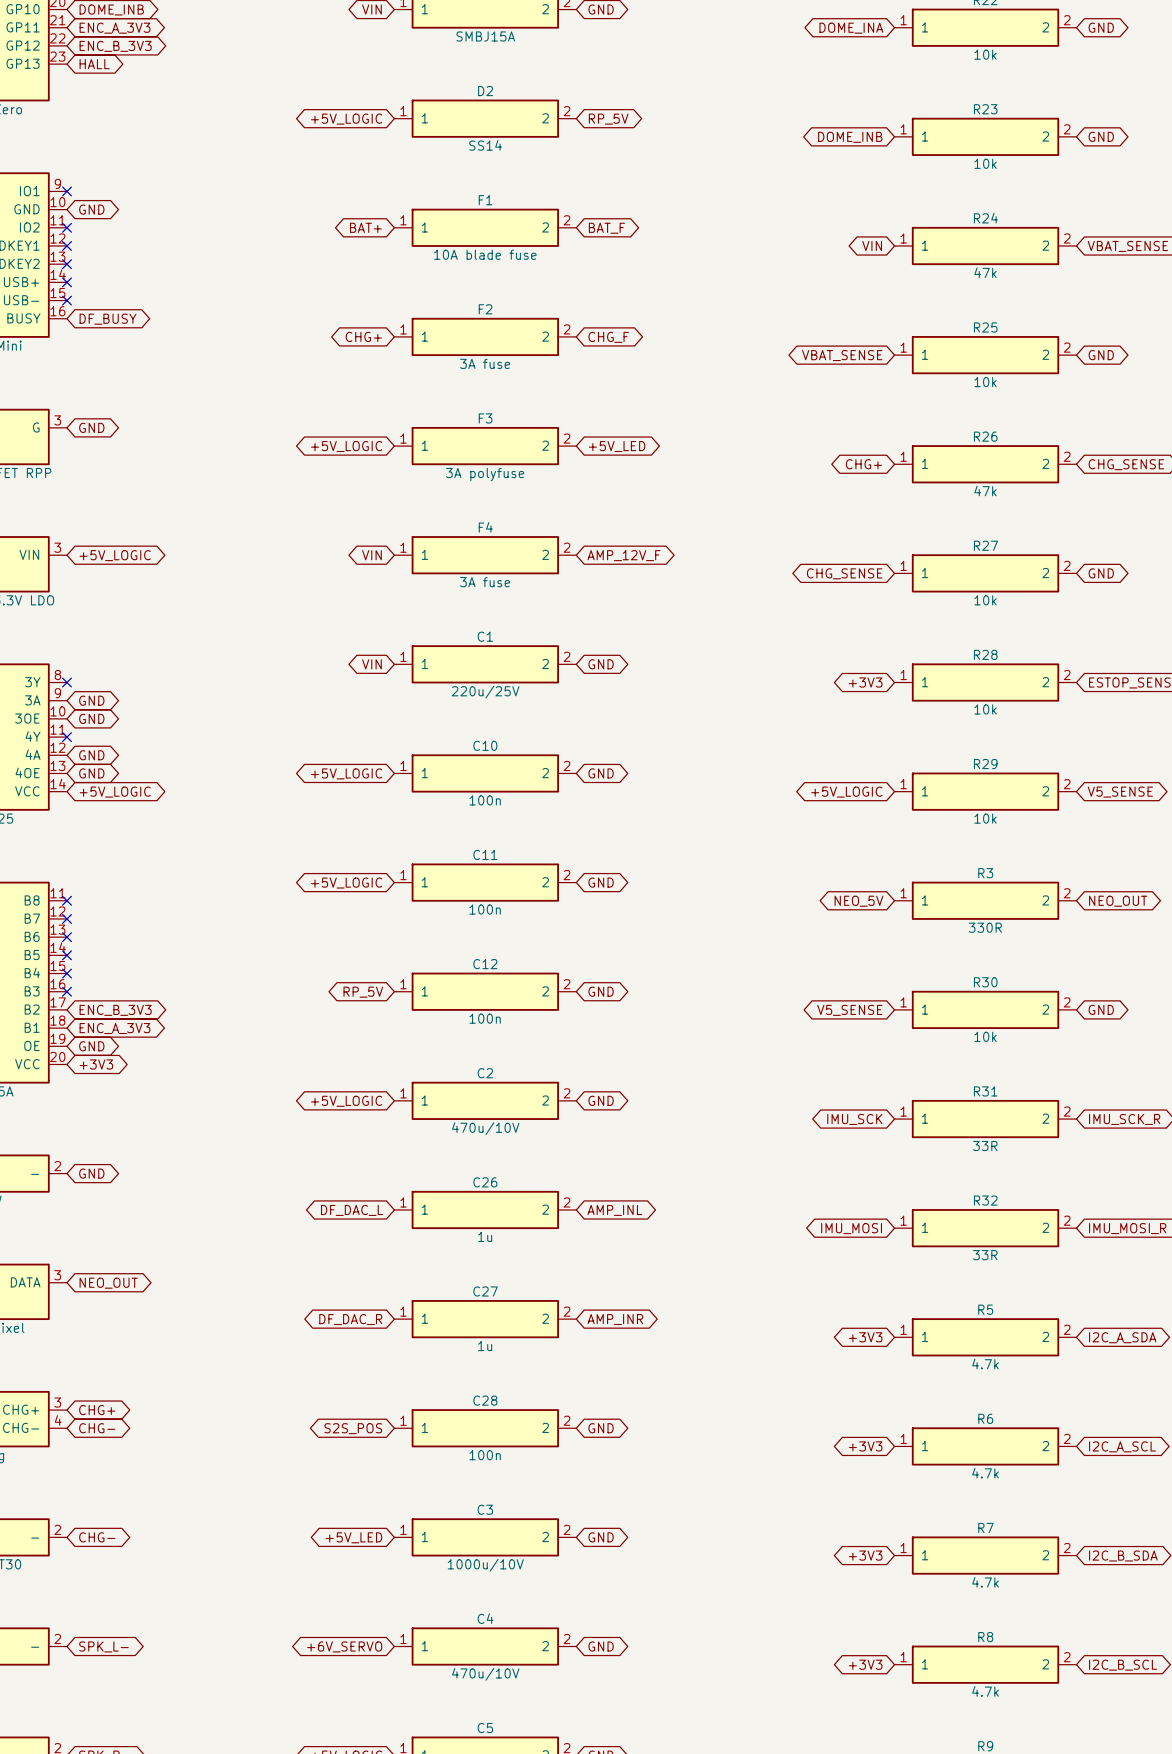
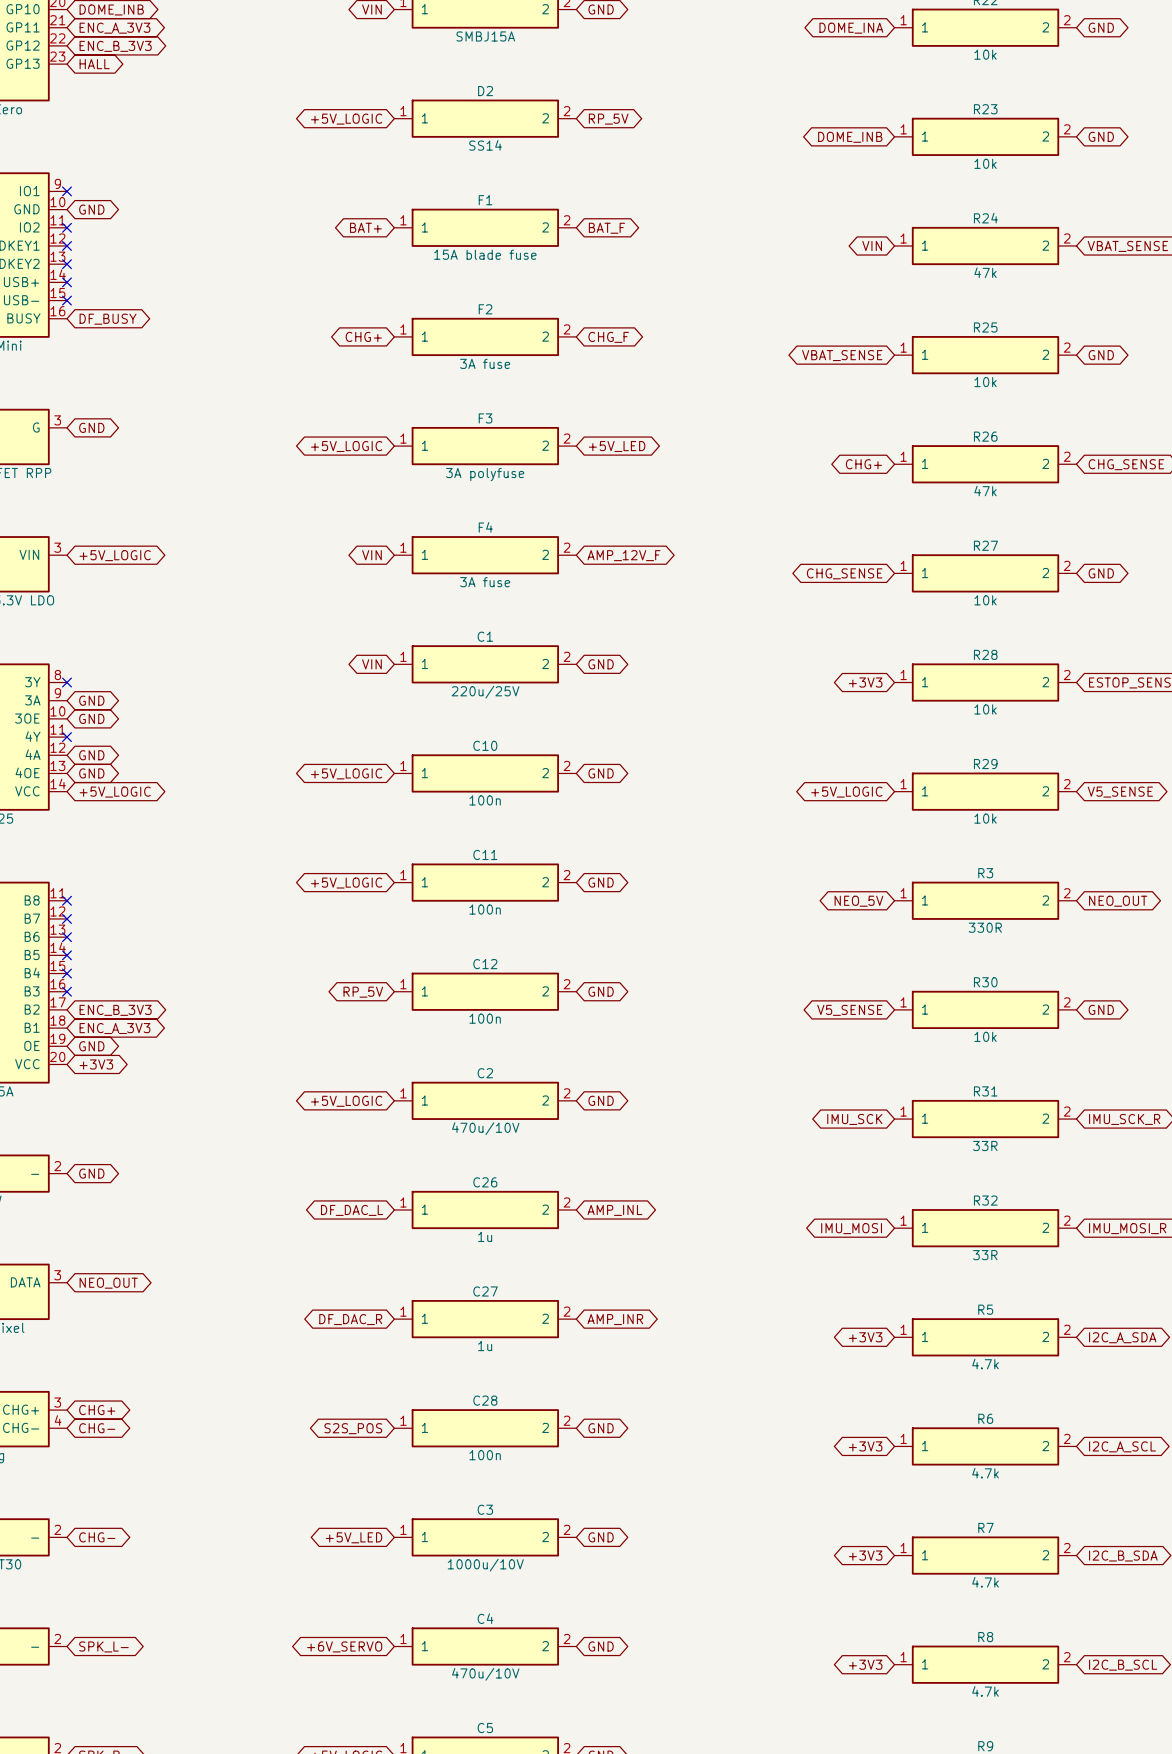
F1 value: 10A blade fuse (485, 254) -> 15A blade fuse (485, 254)

